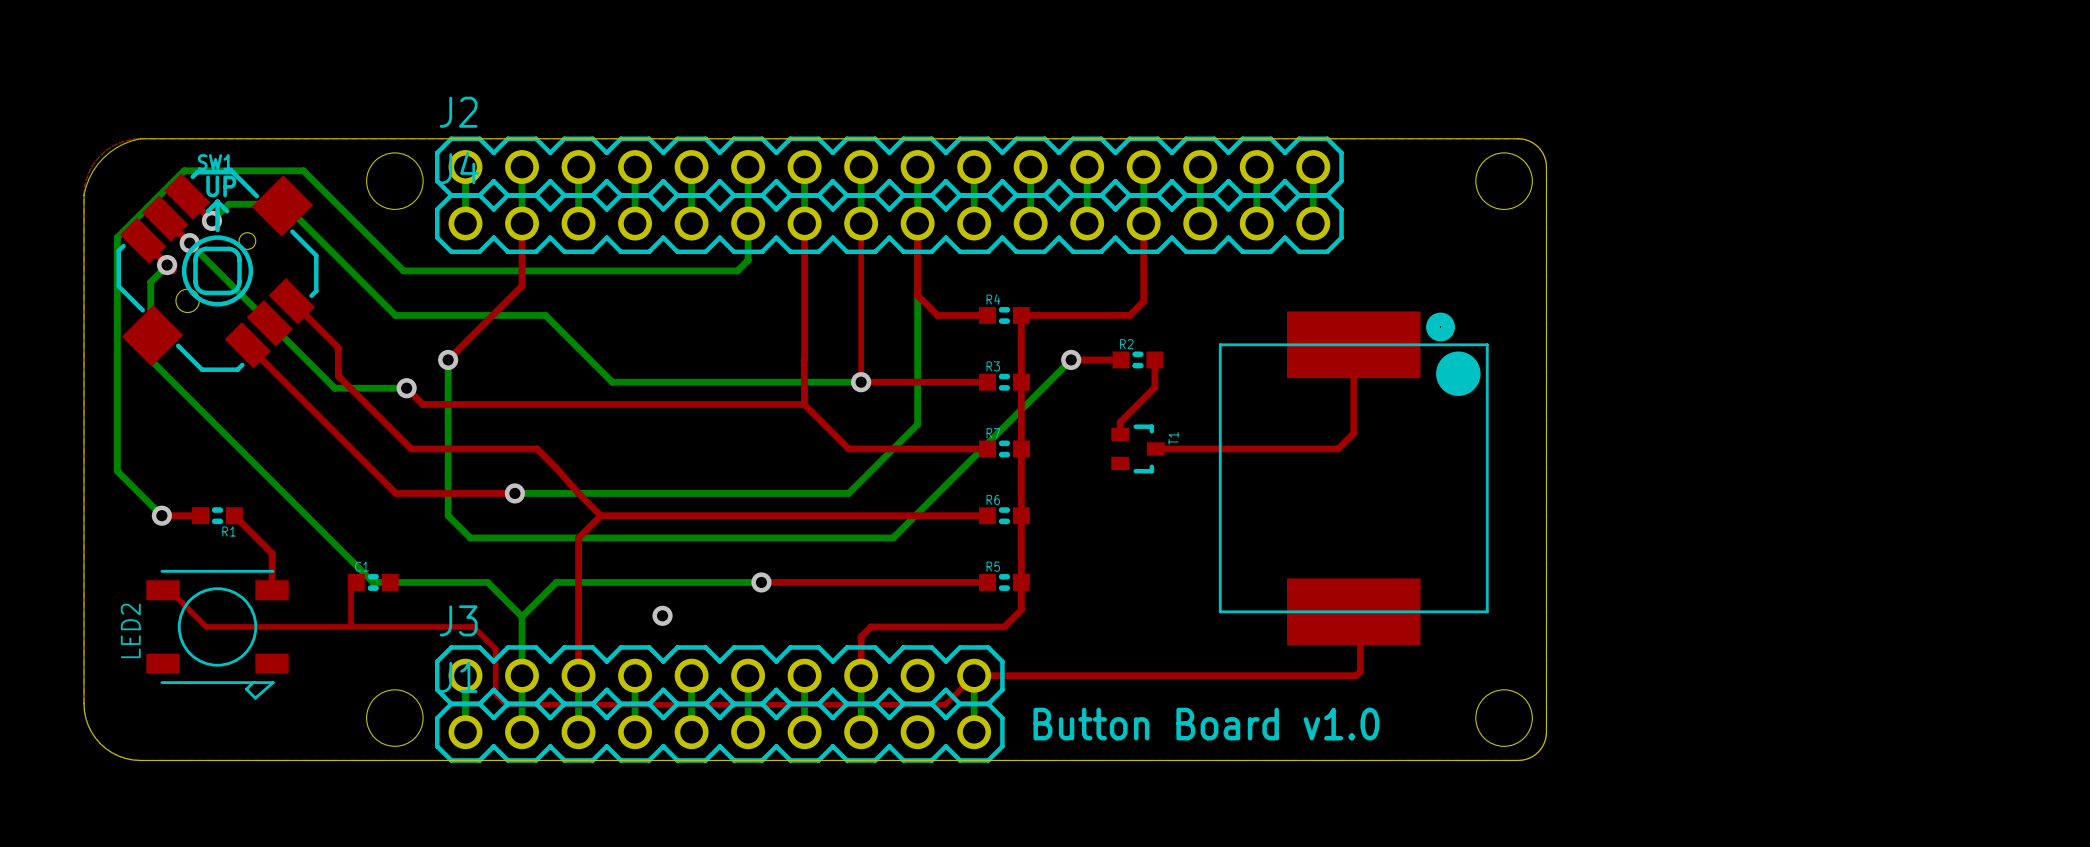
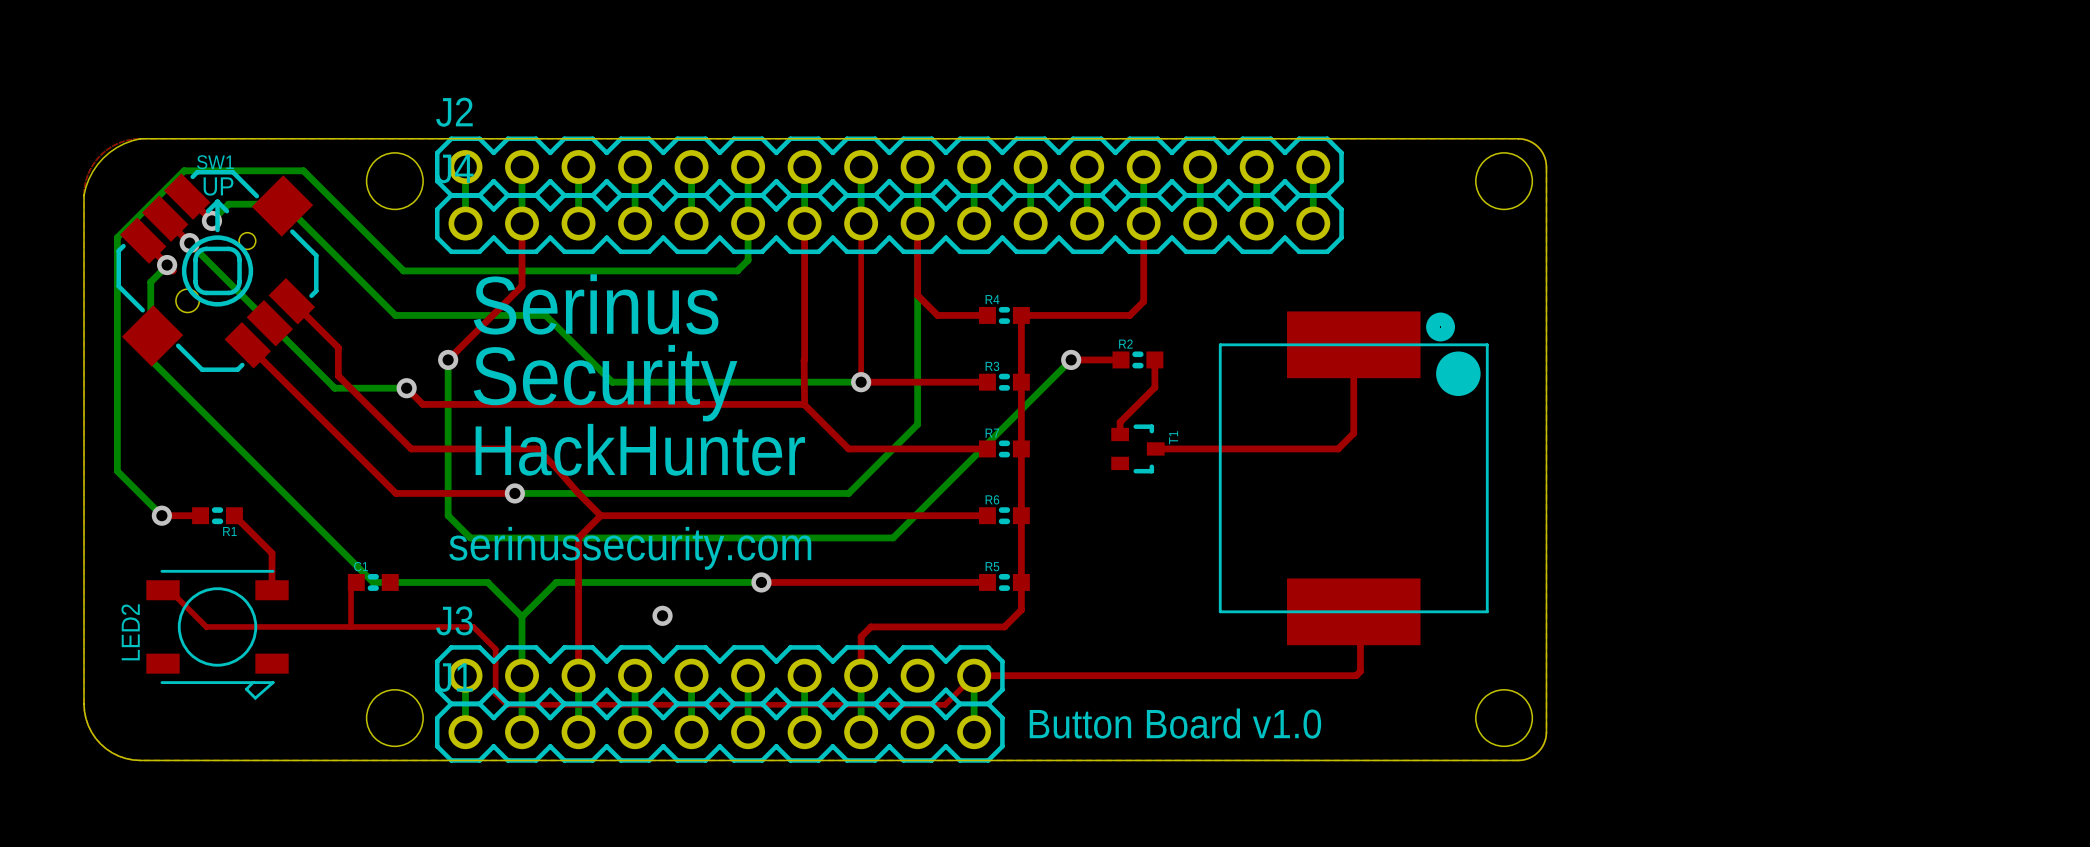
text: none -> Serinus (596, 304)
text: none -> Security (605, 383)
text: none -> HackHunter (640, 449)
text: none -> serinussecurity.com (630, 548)

